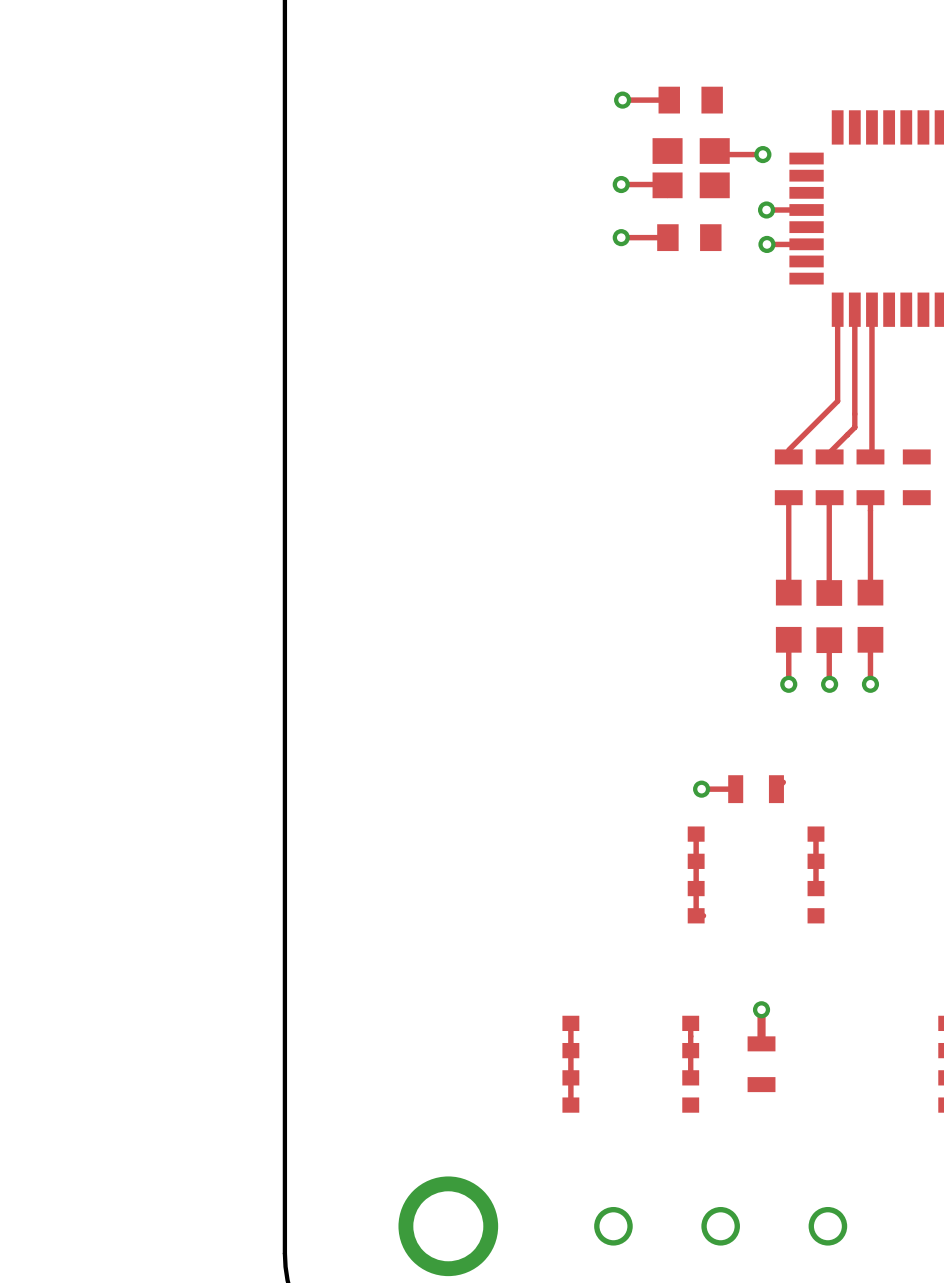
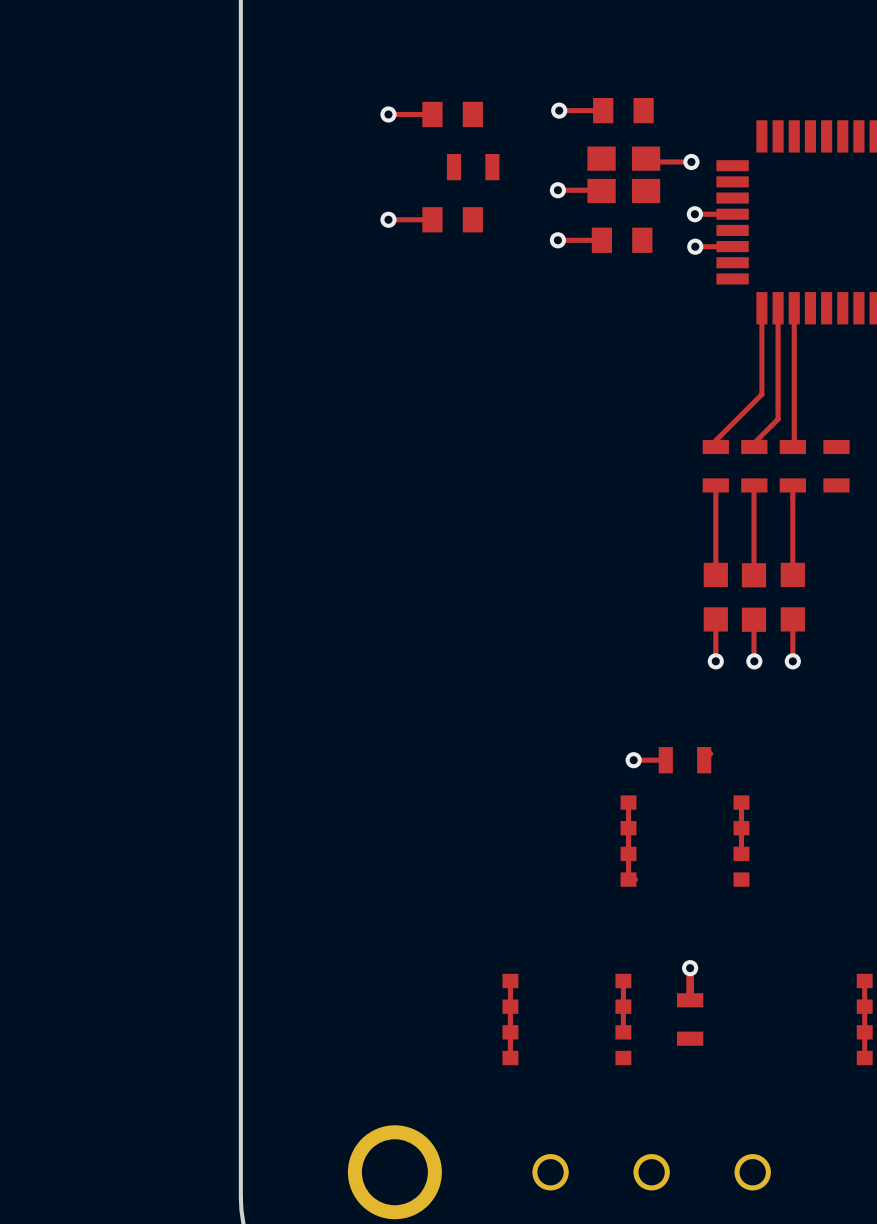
via: none -> (388, 114)
top track: none -> (432, 114) (388, 114)
part: none -> (452, 114)
part: none -> (473, 167)
via: none -> (388, 219)
top track: none -> (432, 219) (388, 219)
part: none -> (452, 219)

